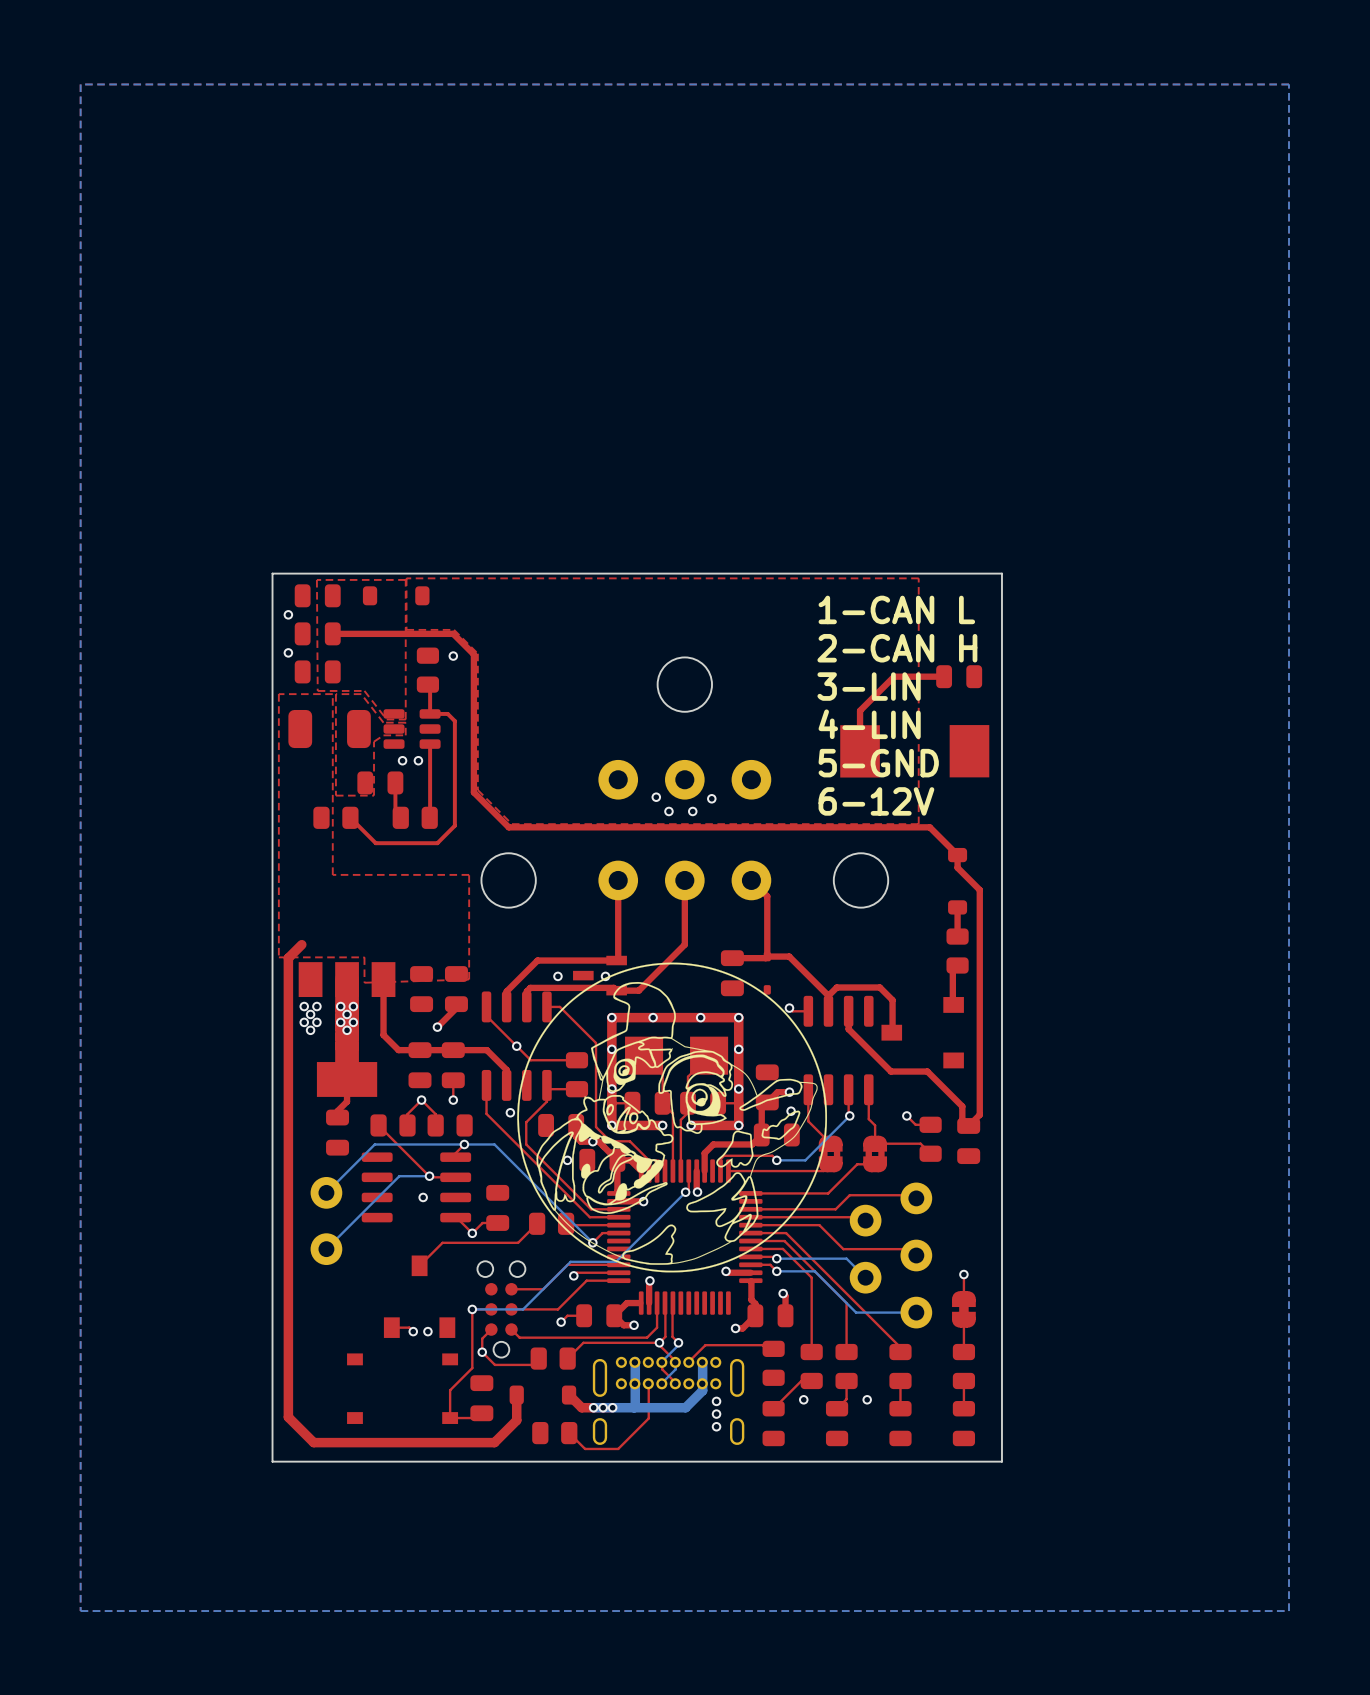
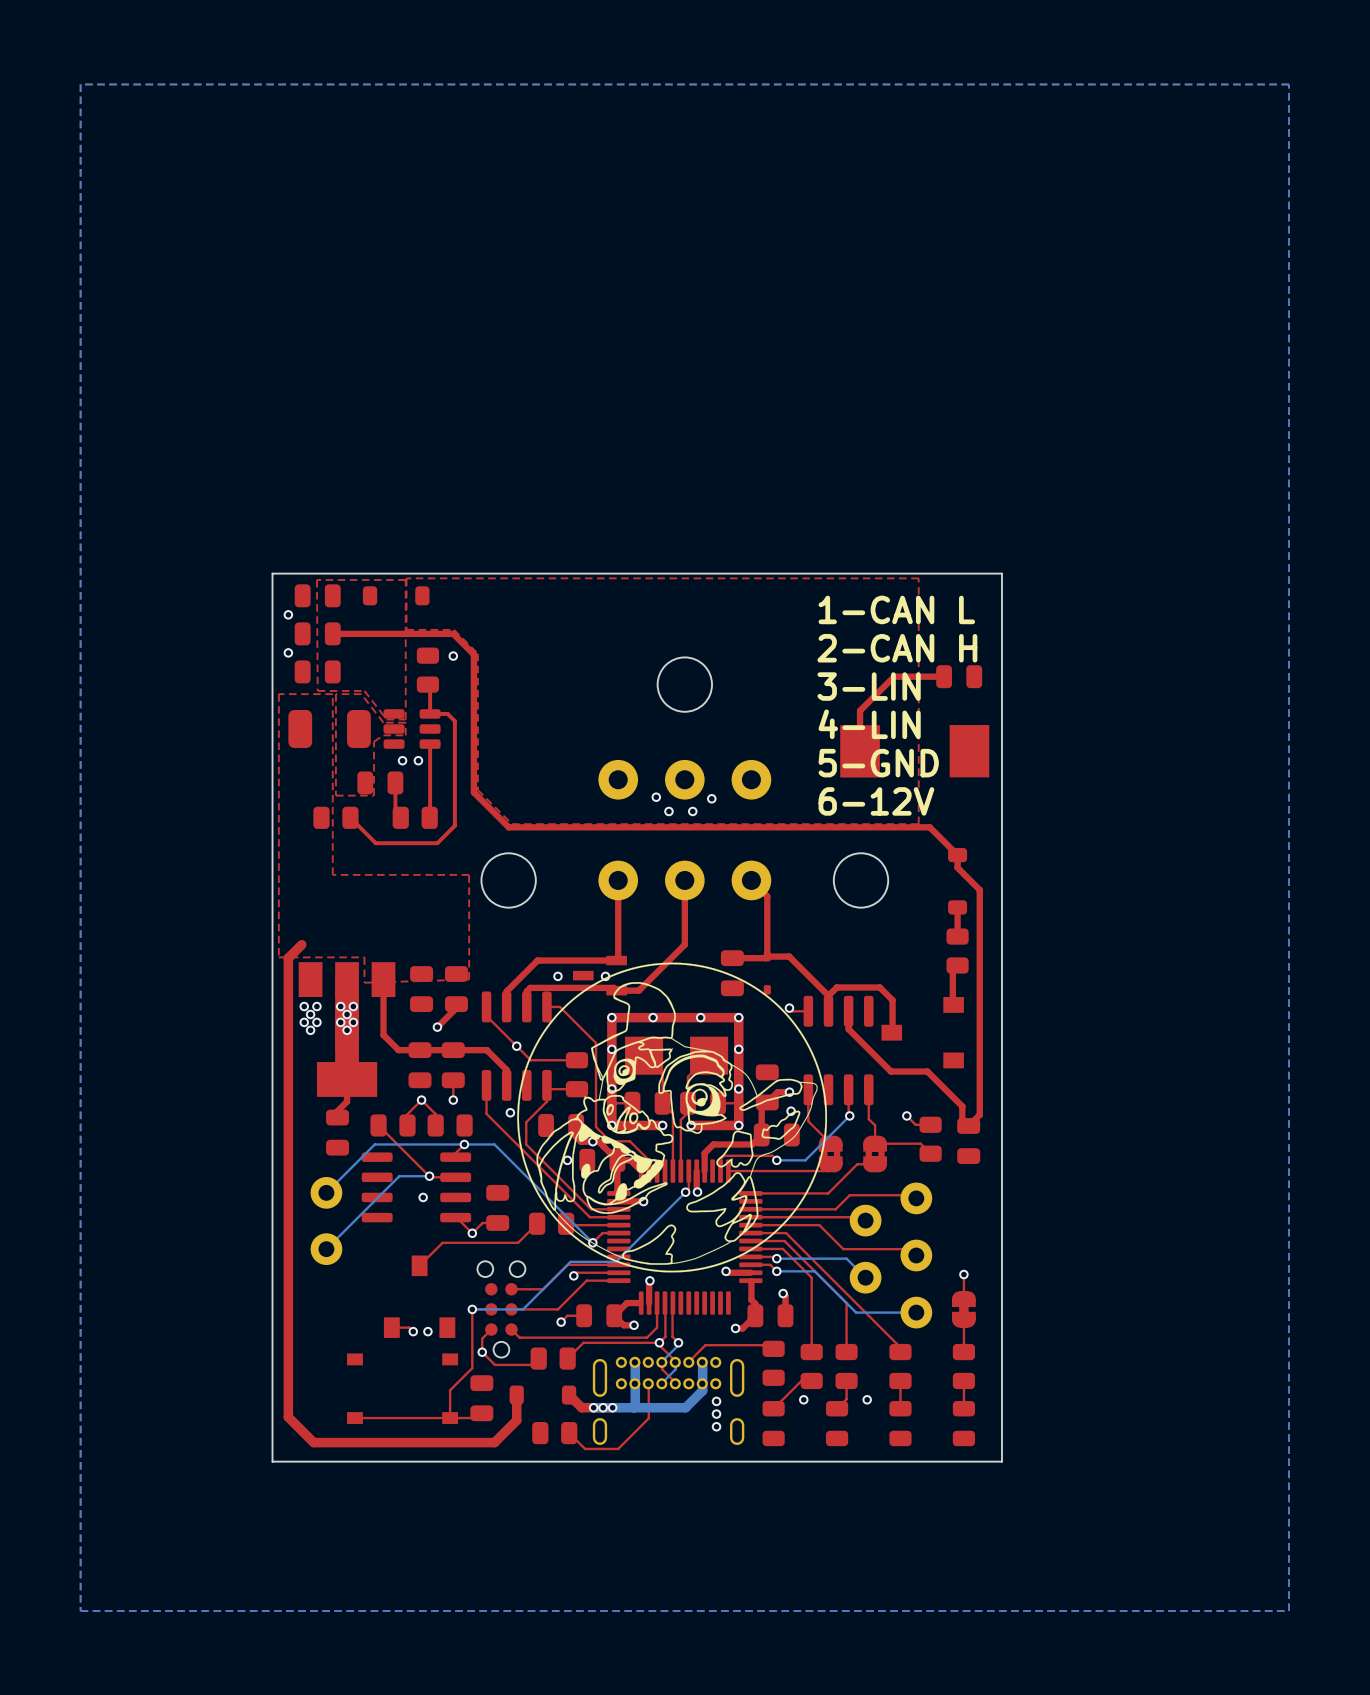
top track: none -> (450, 1418) (354, 1418)

